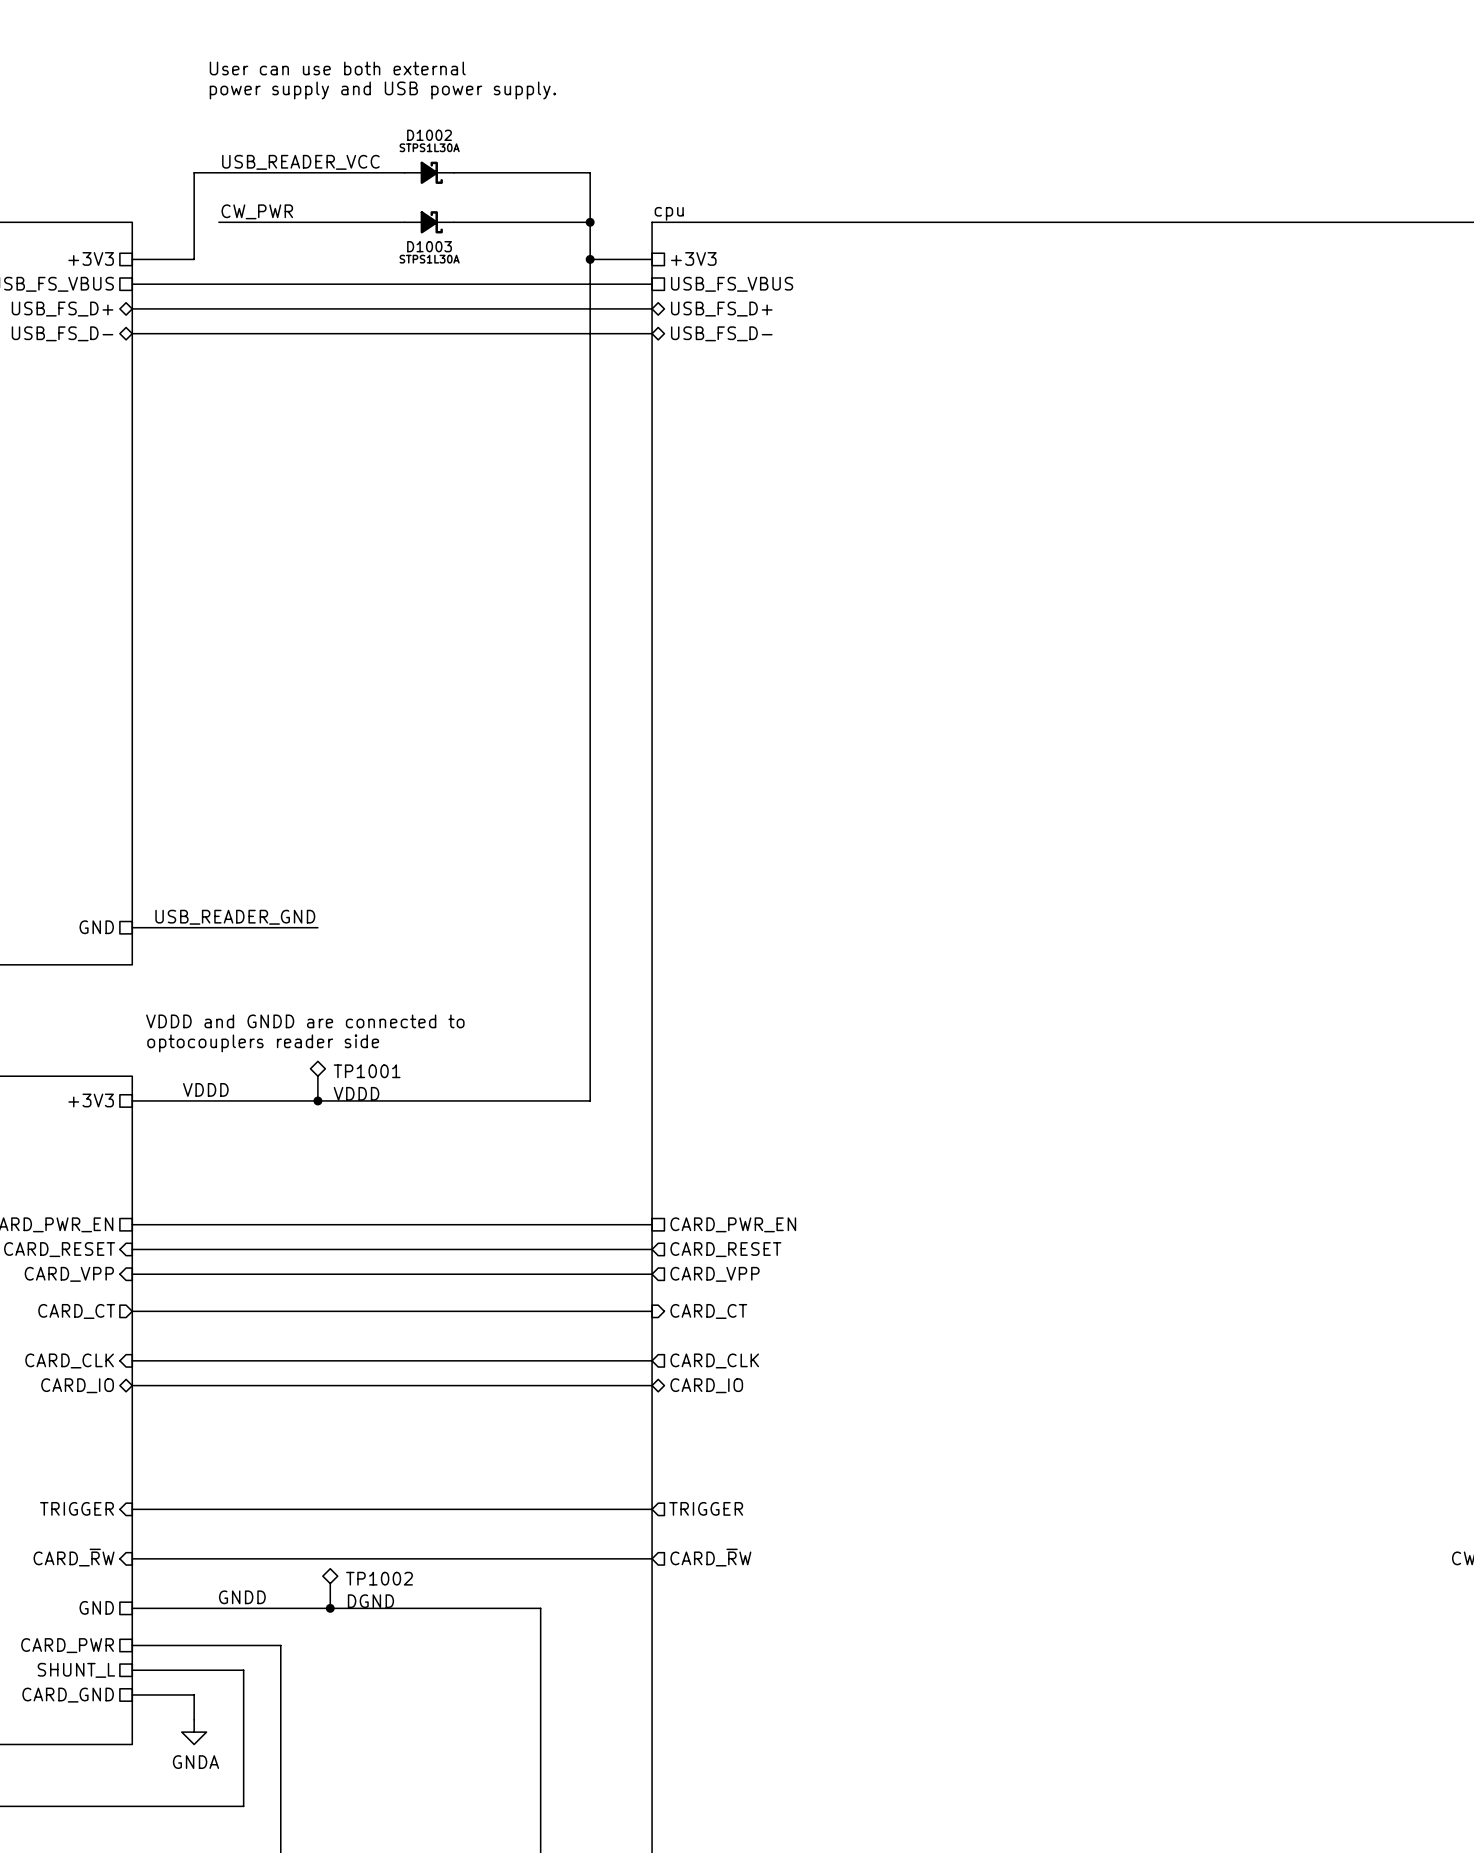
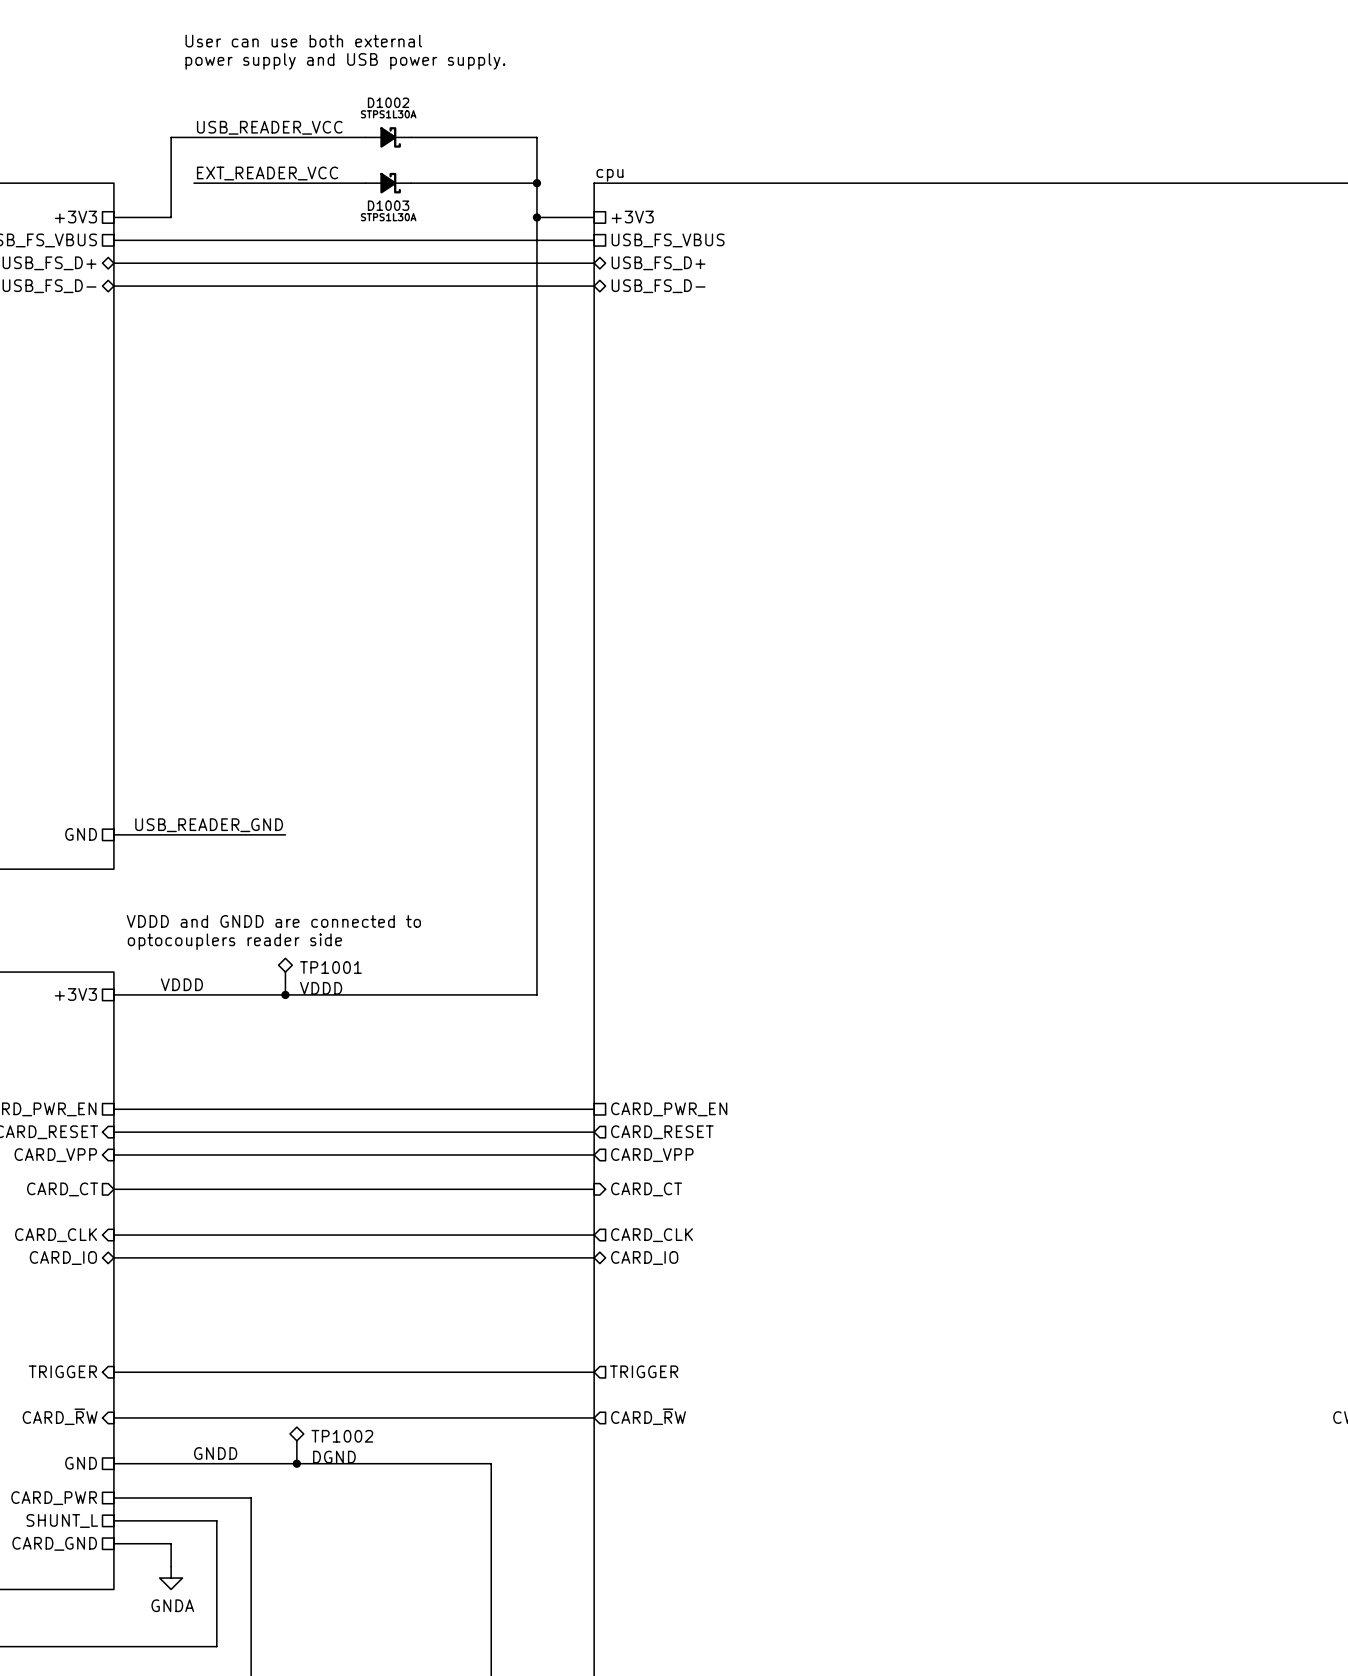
label: CW_PWR (257, 211) -> EXT_READER_VCC (267, 173)

